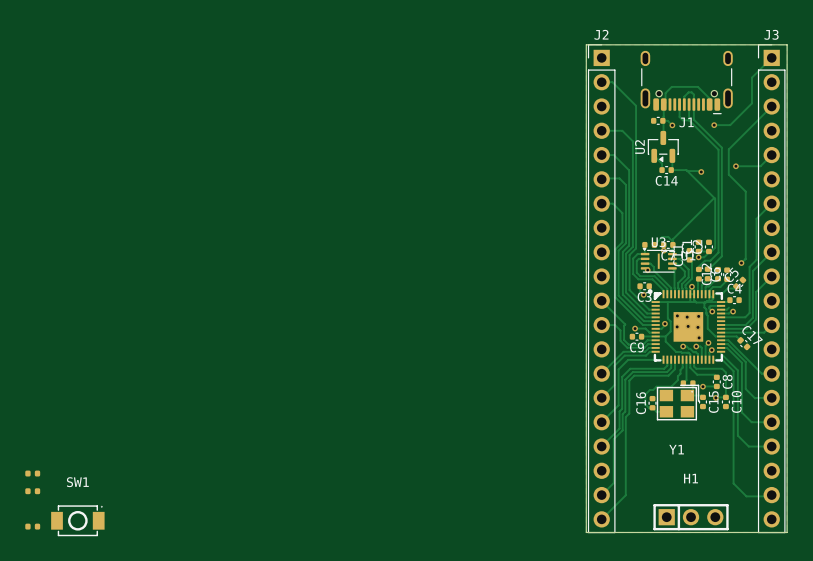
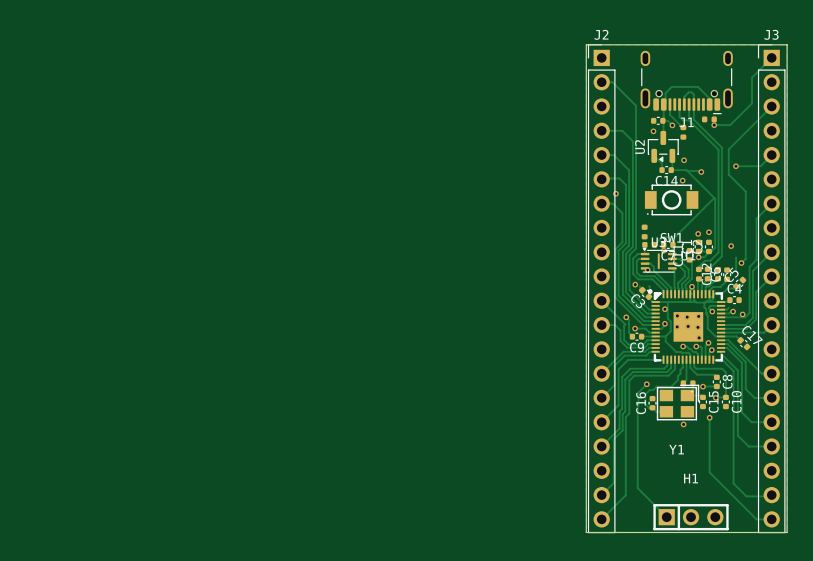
track: none -> (669, 104) (669, 114) (683, 127)
part: none -> (709, 119)
via: none -> (653, 131)
part: none -> (683, 132)
via: none -> (684, 160)
via: none -> (682, 180)
via: none -> (615, 193)
part: none -> (644, 232)
via: none -> (708, 232)
via: none -> (698, 233)
via: none -> (731, 246)
track: none -> (736, 257) (736, 271)
via: none -> (635, 284)
C3 rotation: 0° (644, 286) -> 45° clockwise (645, 293)
via: (643, 294) -> none
via: none -> (664, 309)
via: none -> (742, 314)
track: none -> (626, 317) (628, 319) (629, 332) (632, 336)
via: none -> (626, 317)
track: none -> (646, 384) (638, 392) (637, 488) (666, 517)
via: none -> (646, 384)
track: none -> (709, 417) (709, 472) (756, 519) (771, 519)
via: none -> (709, 417)
via: none -> (683, 424)
part: (32, 473) -> none
part: (32, 491) -> none
SW1 rotation: 0° (77, 520) -> 180° (671, 199)
SW1 position: (77, 520) -> (671, 199)
part: (32, 526) -> none

